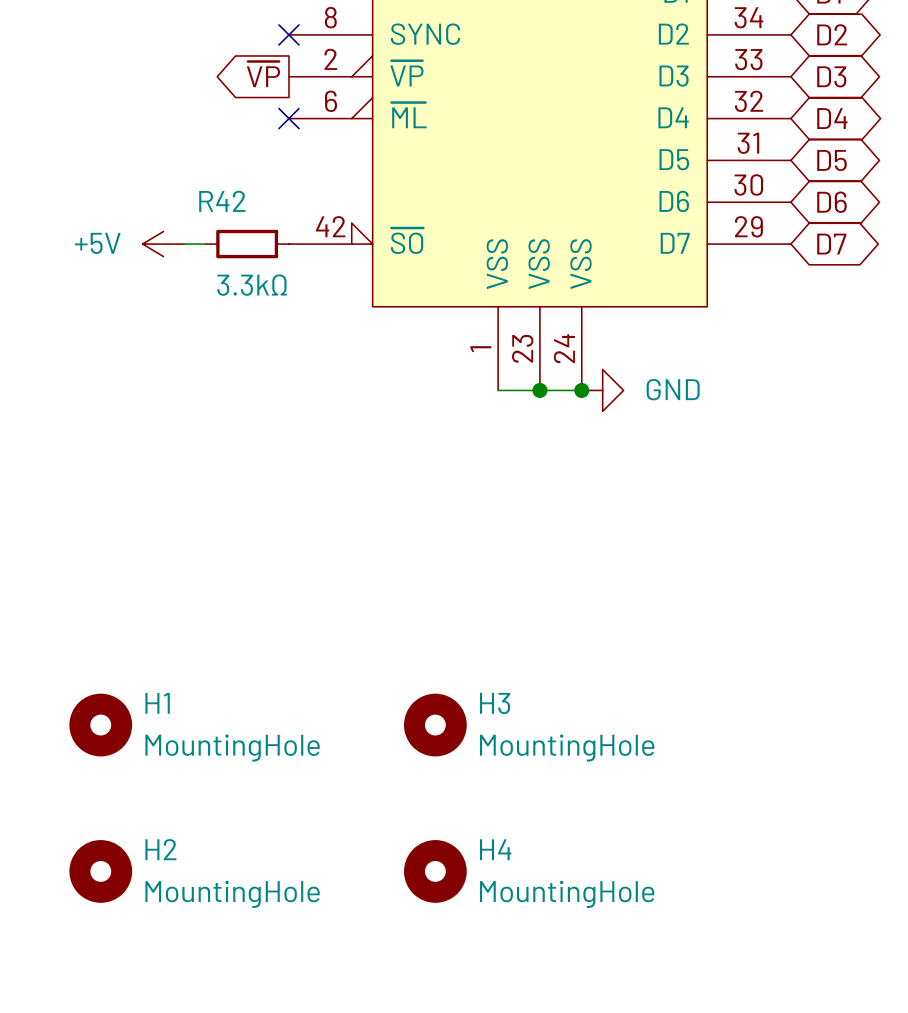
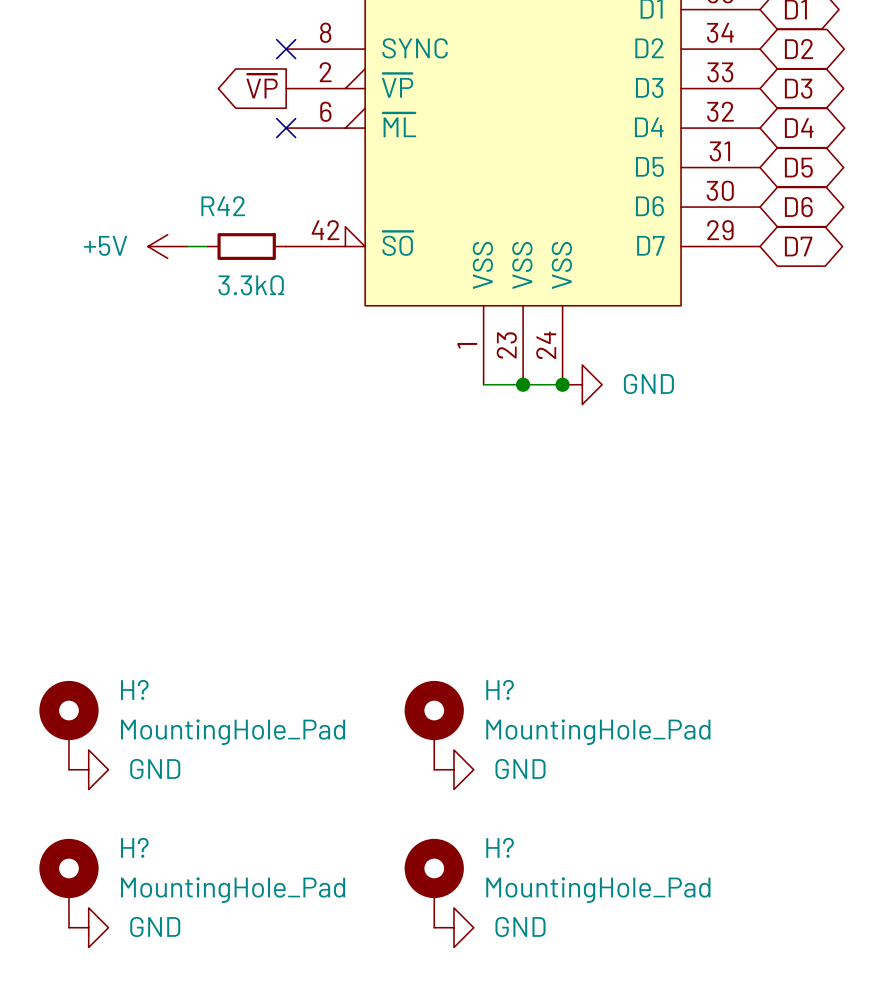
H1: MountingHole (100, 725) -> none
H3: MountingHole (435, 725) -> none
H?: none -> MountingHole_Pad (68, 725)
H?: none -> MountingHole_Pad (434, 725)
power symbol: none -> GND (88, 769)
power symbol: none -> GND (453, 769)
H2: MountingHole (100, 871) -> none
H4: MountingHole (435, 871) -> none
H?: none -> MountingHole_Pad (68, 883)
H?: none -> MountingHole_Pad (434, 883)
power symbol: none -> GND (88, 927)
power symbol: none -> GND (453, 927)

